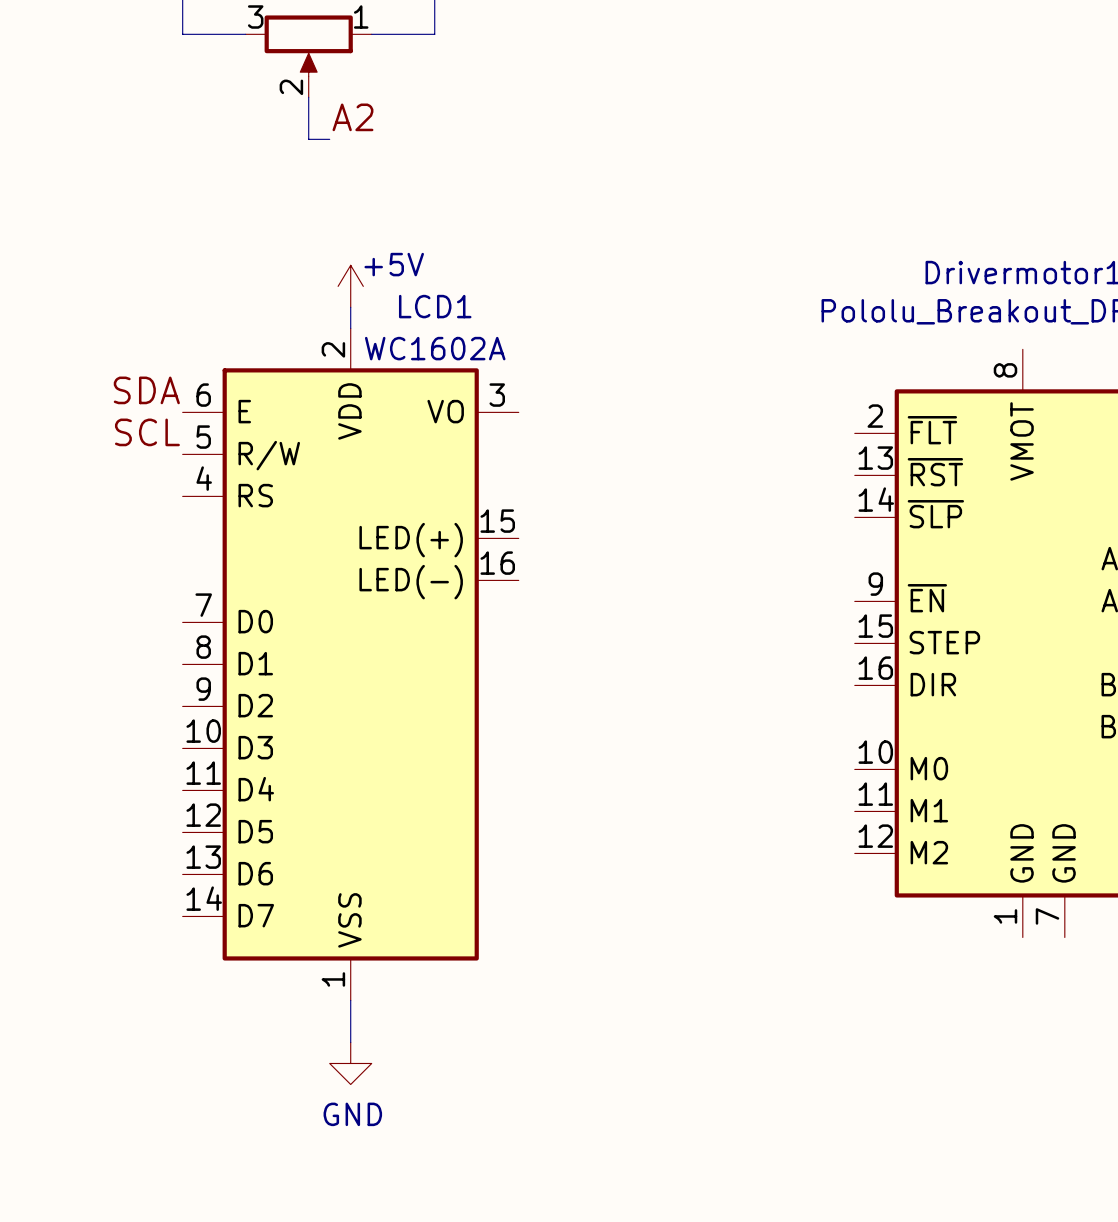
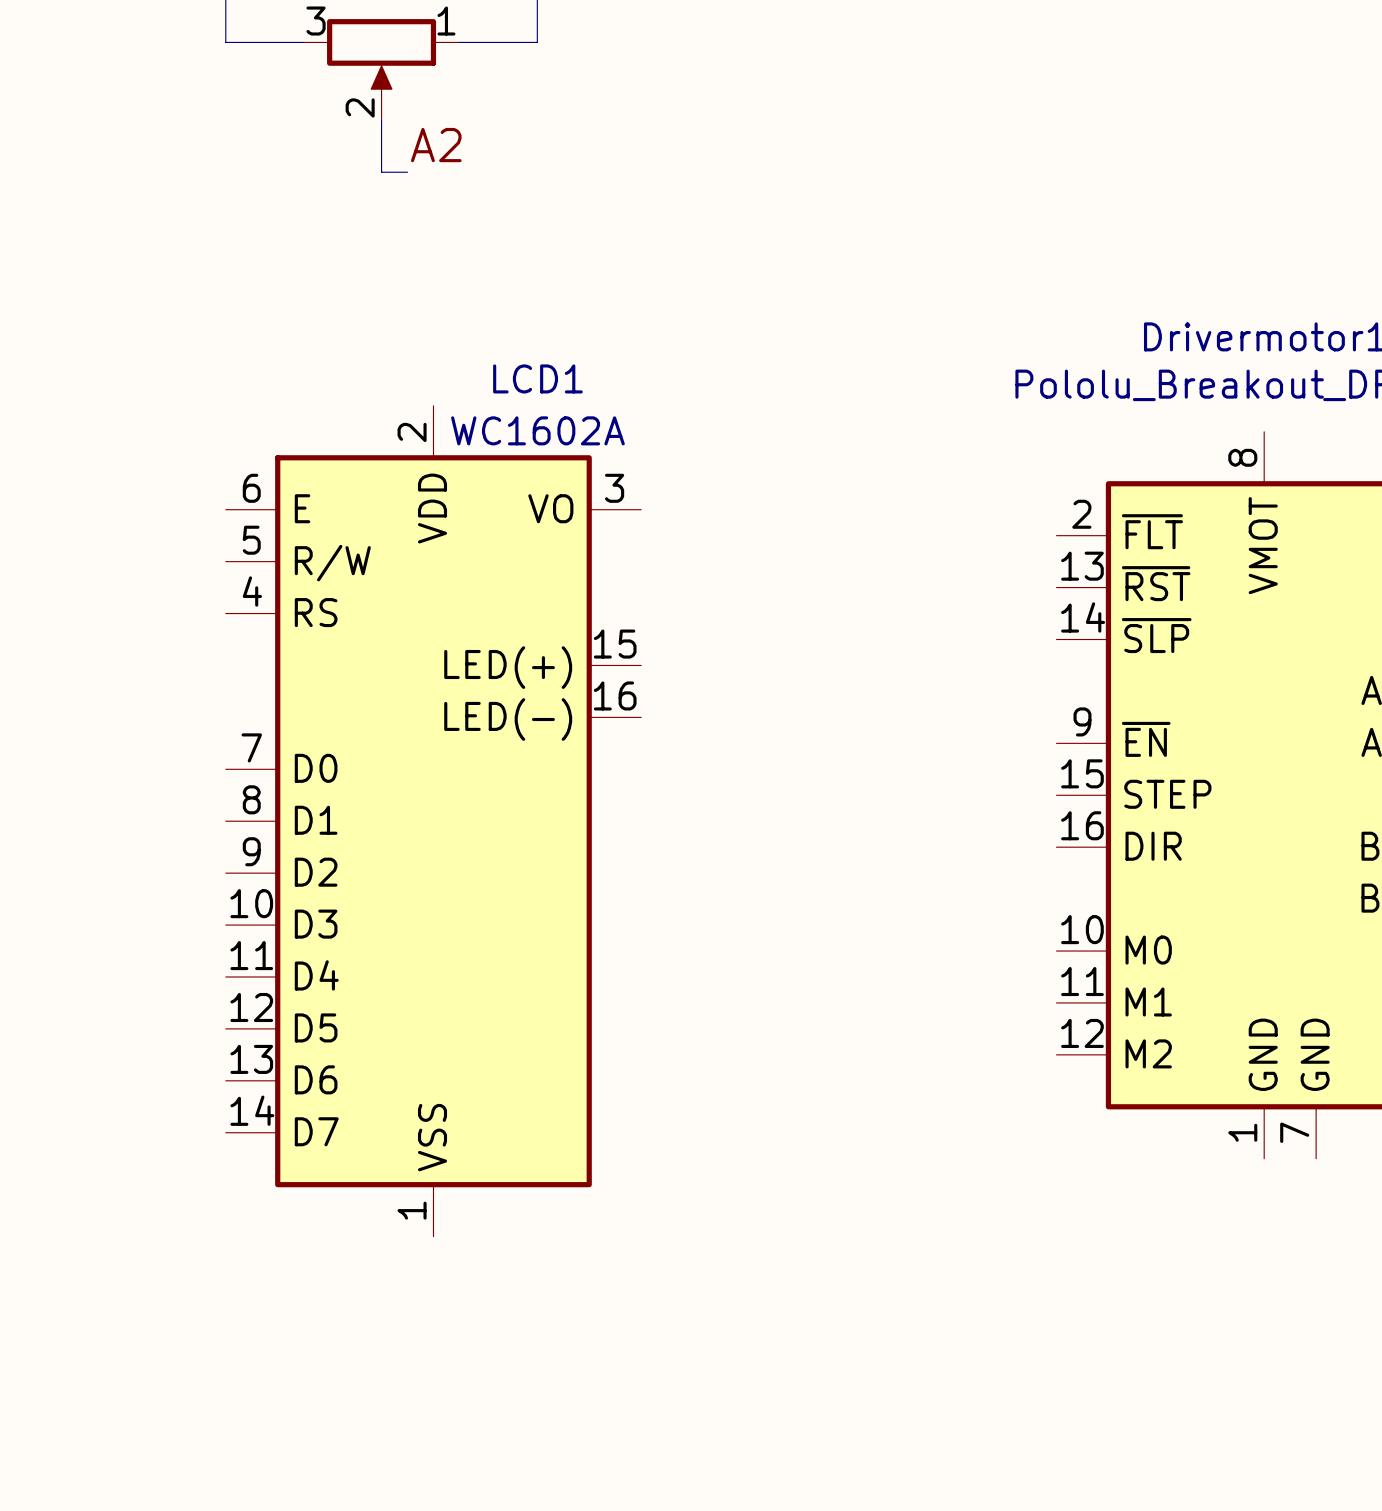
power symbol: +5V (350, 286) -> none
wire: (350, 307) (350, 328) -> none
label: SDA (146, 390) -> none
label: SCL (147, 432) -> none
wire: (350, 1000) (350, 1042) -> none
power symbol: GND (350, 1063) -> none

